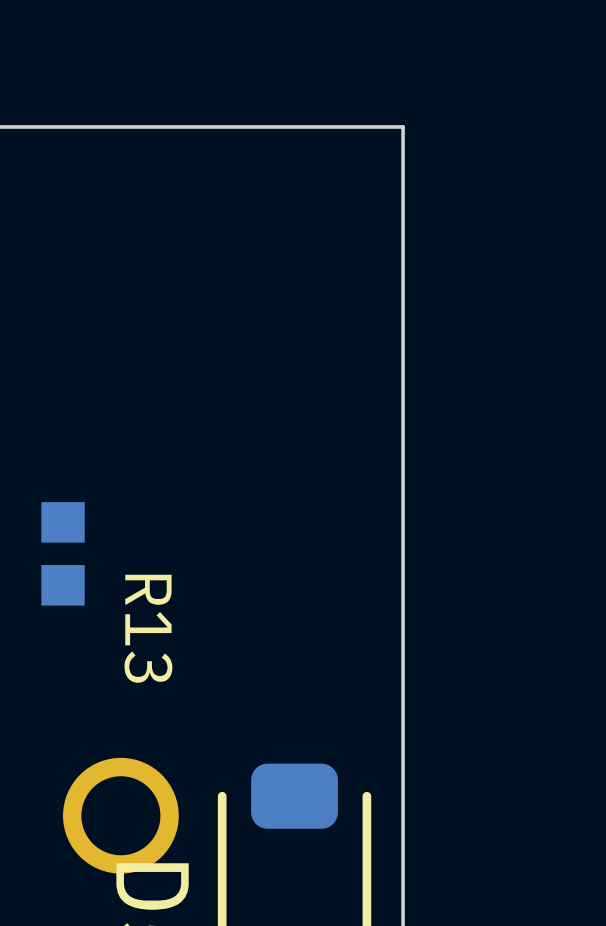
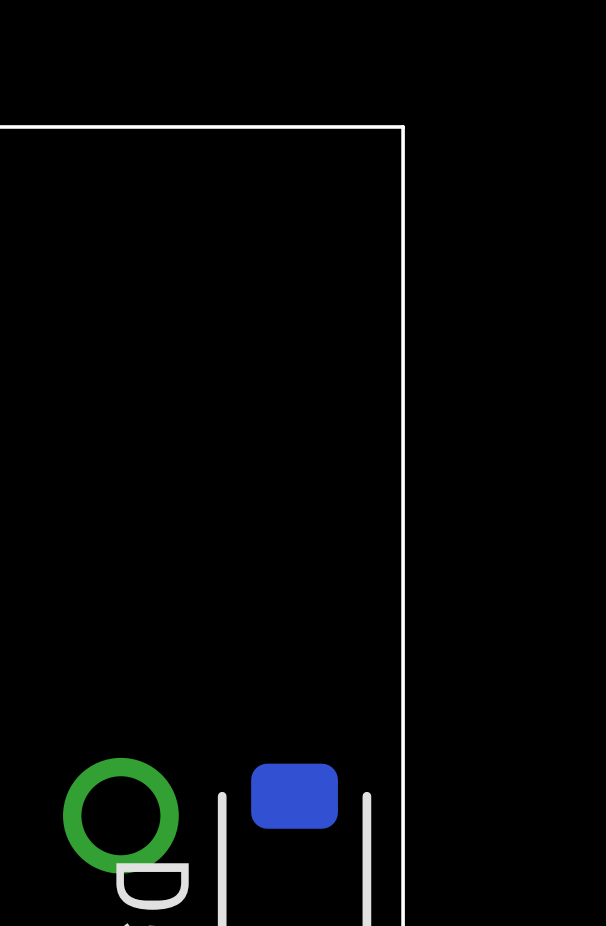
R13: (63, 553) -> none

